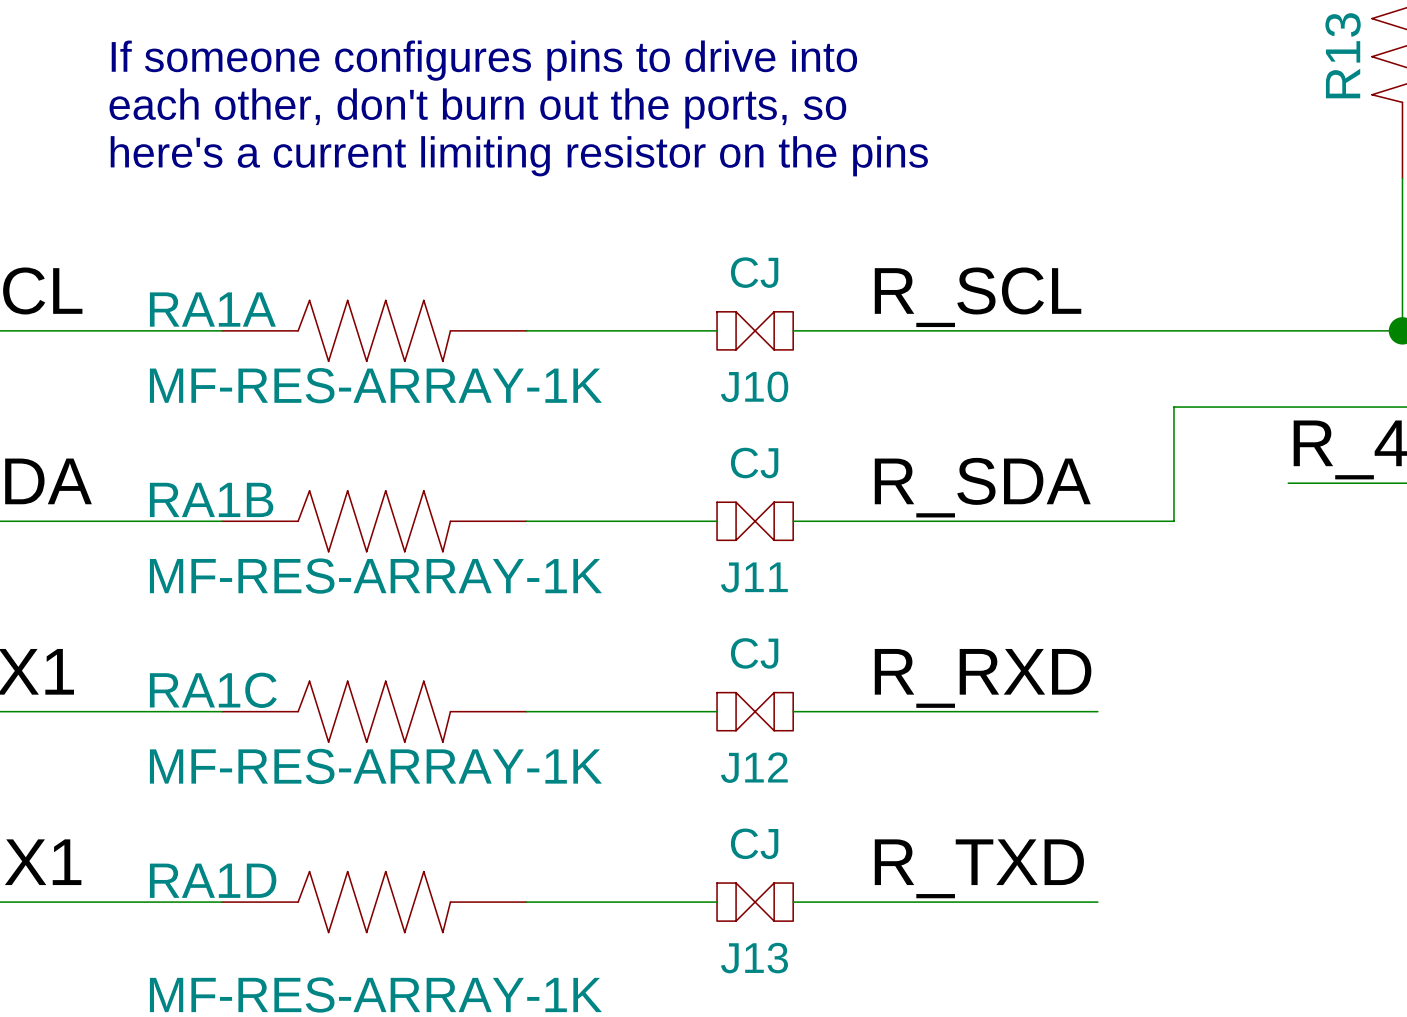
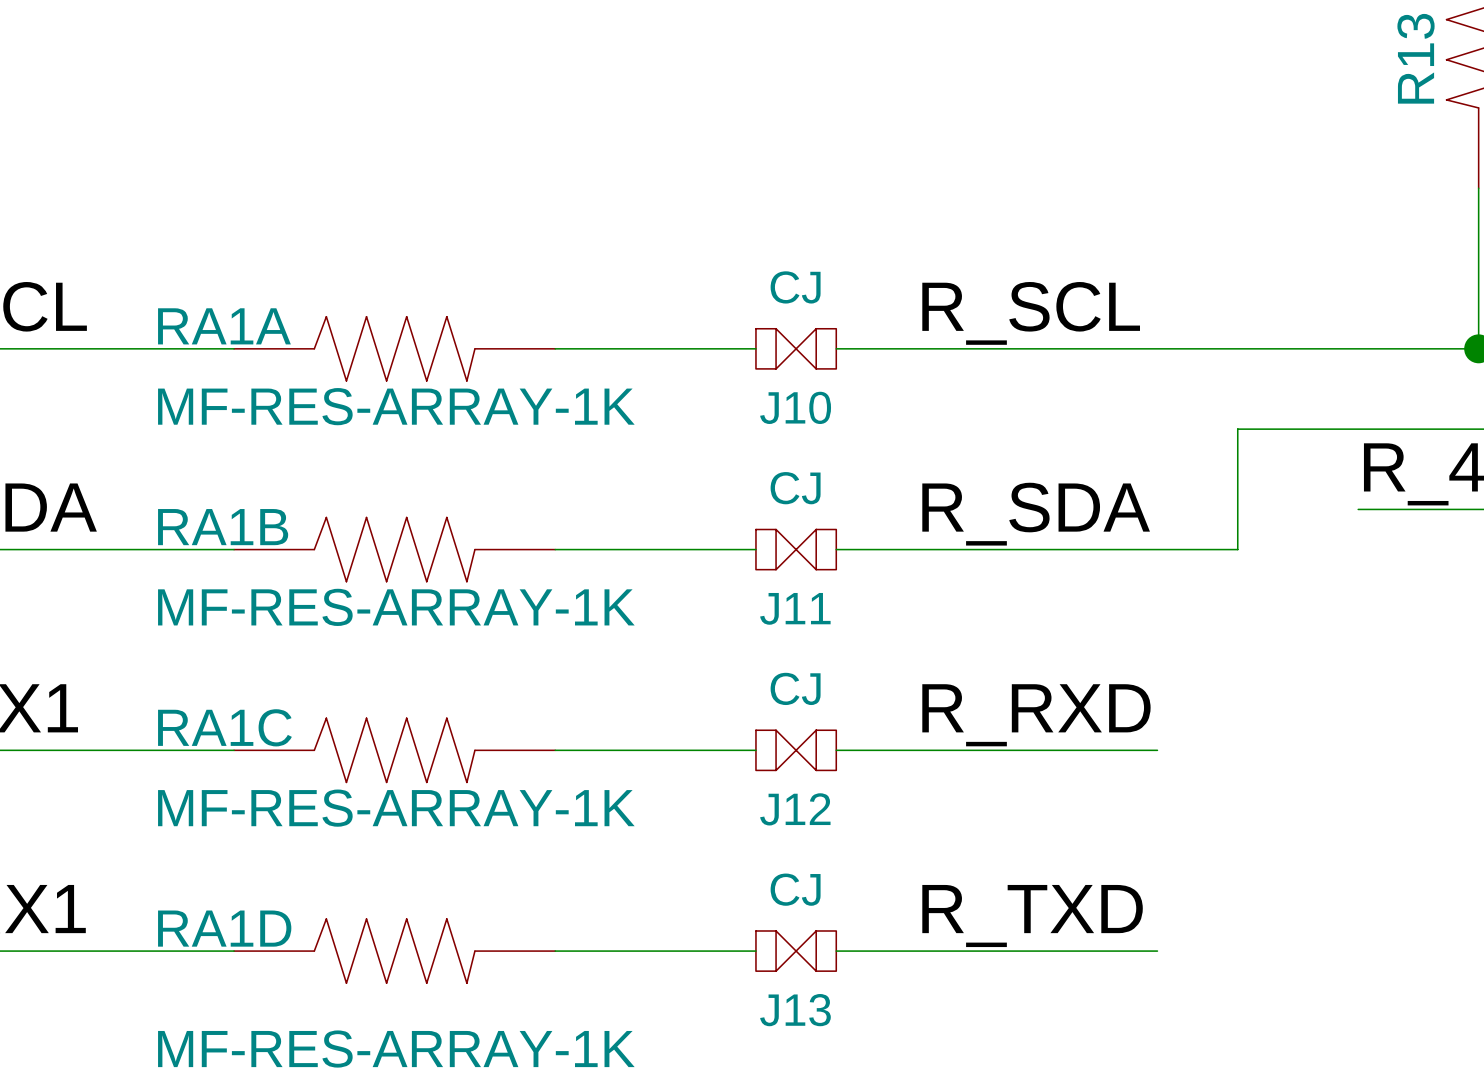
text: If someone configures pins to drive into (484, 60) -> none
text: each other, don't burn out the ports, so (477, 108) -> none
text: here's a current limiting resistor on the pins (519, 156) -> none

